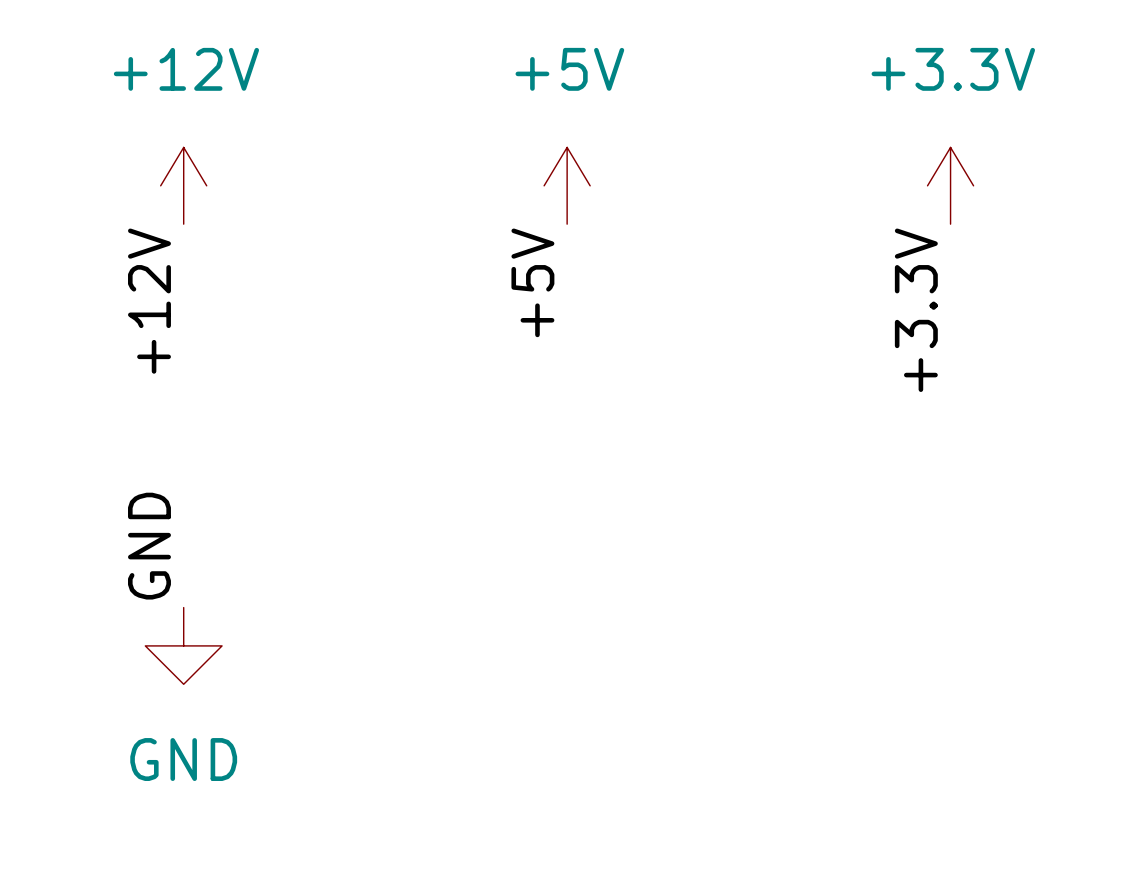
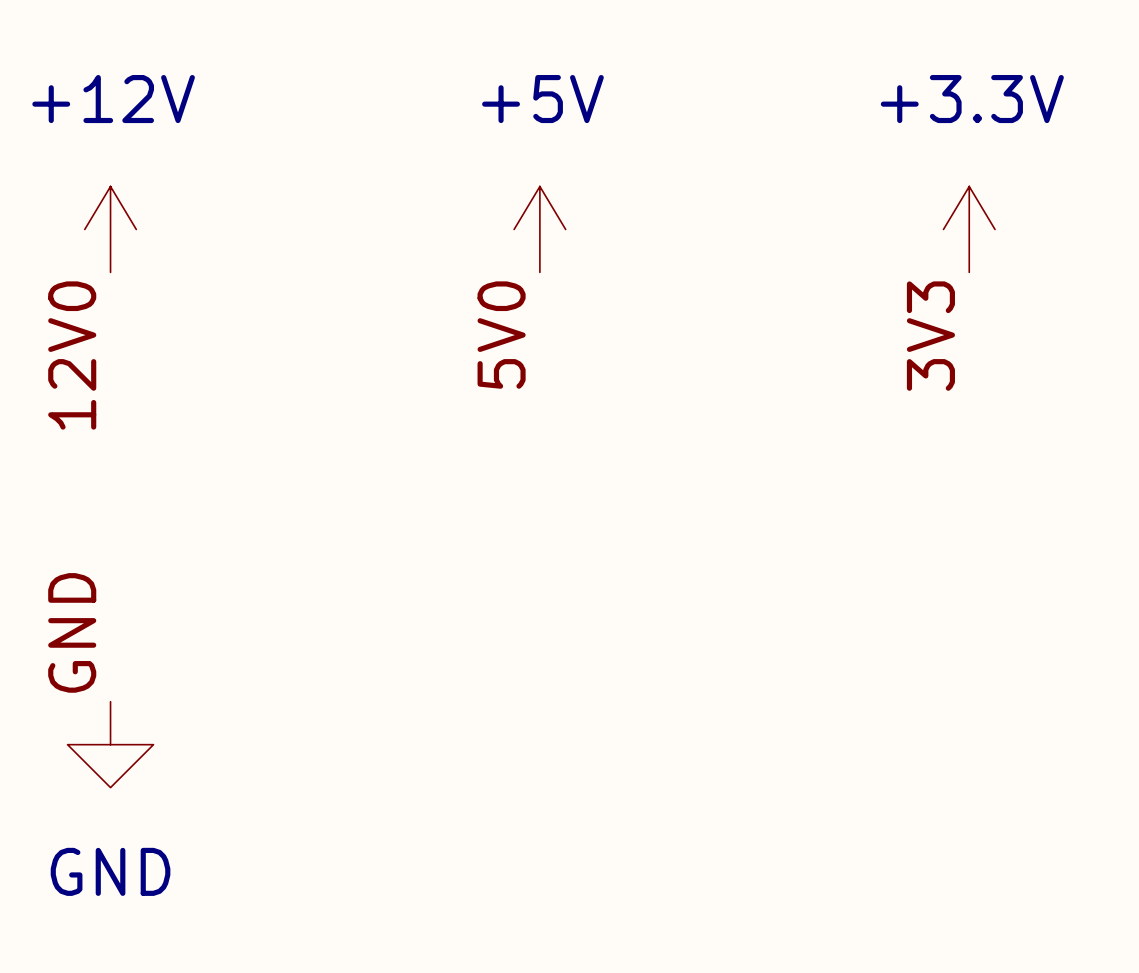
label: +5V (532, 282) -> 5V0 (501, 335)
label: +12V (149, 301) -> 12V0 (72, 355)
label: +3.3V (916, 310) -> 3V3 (930, 336)

